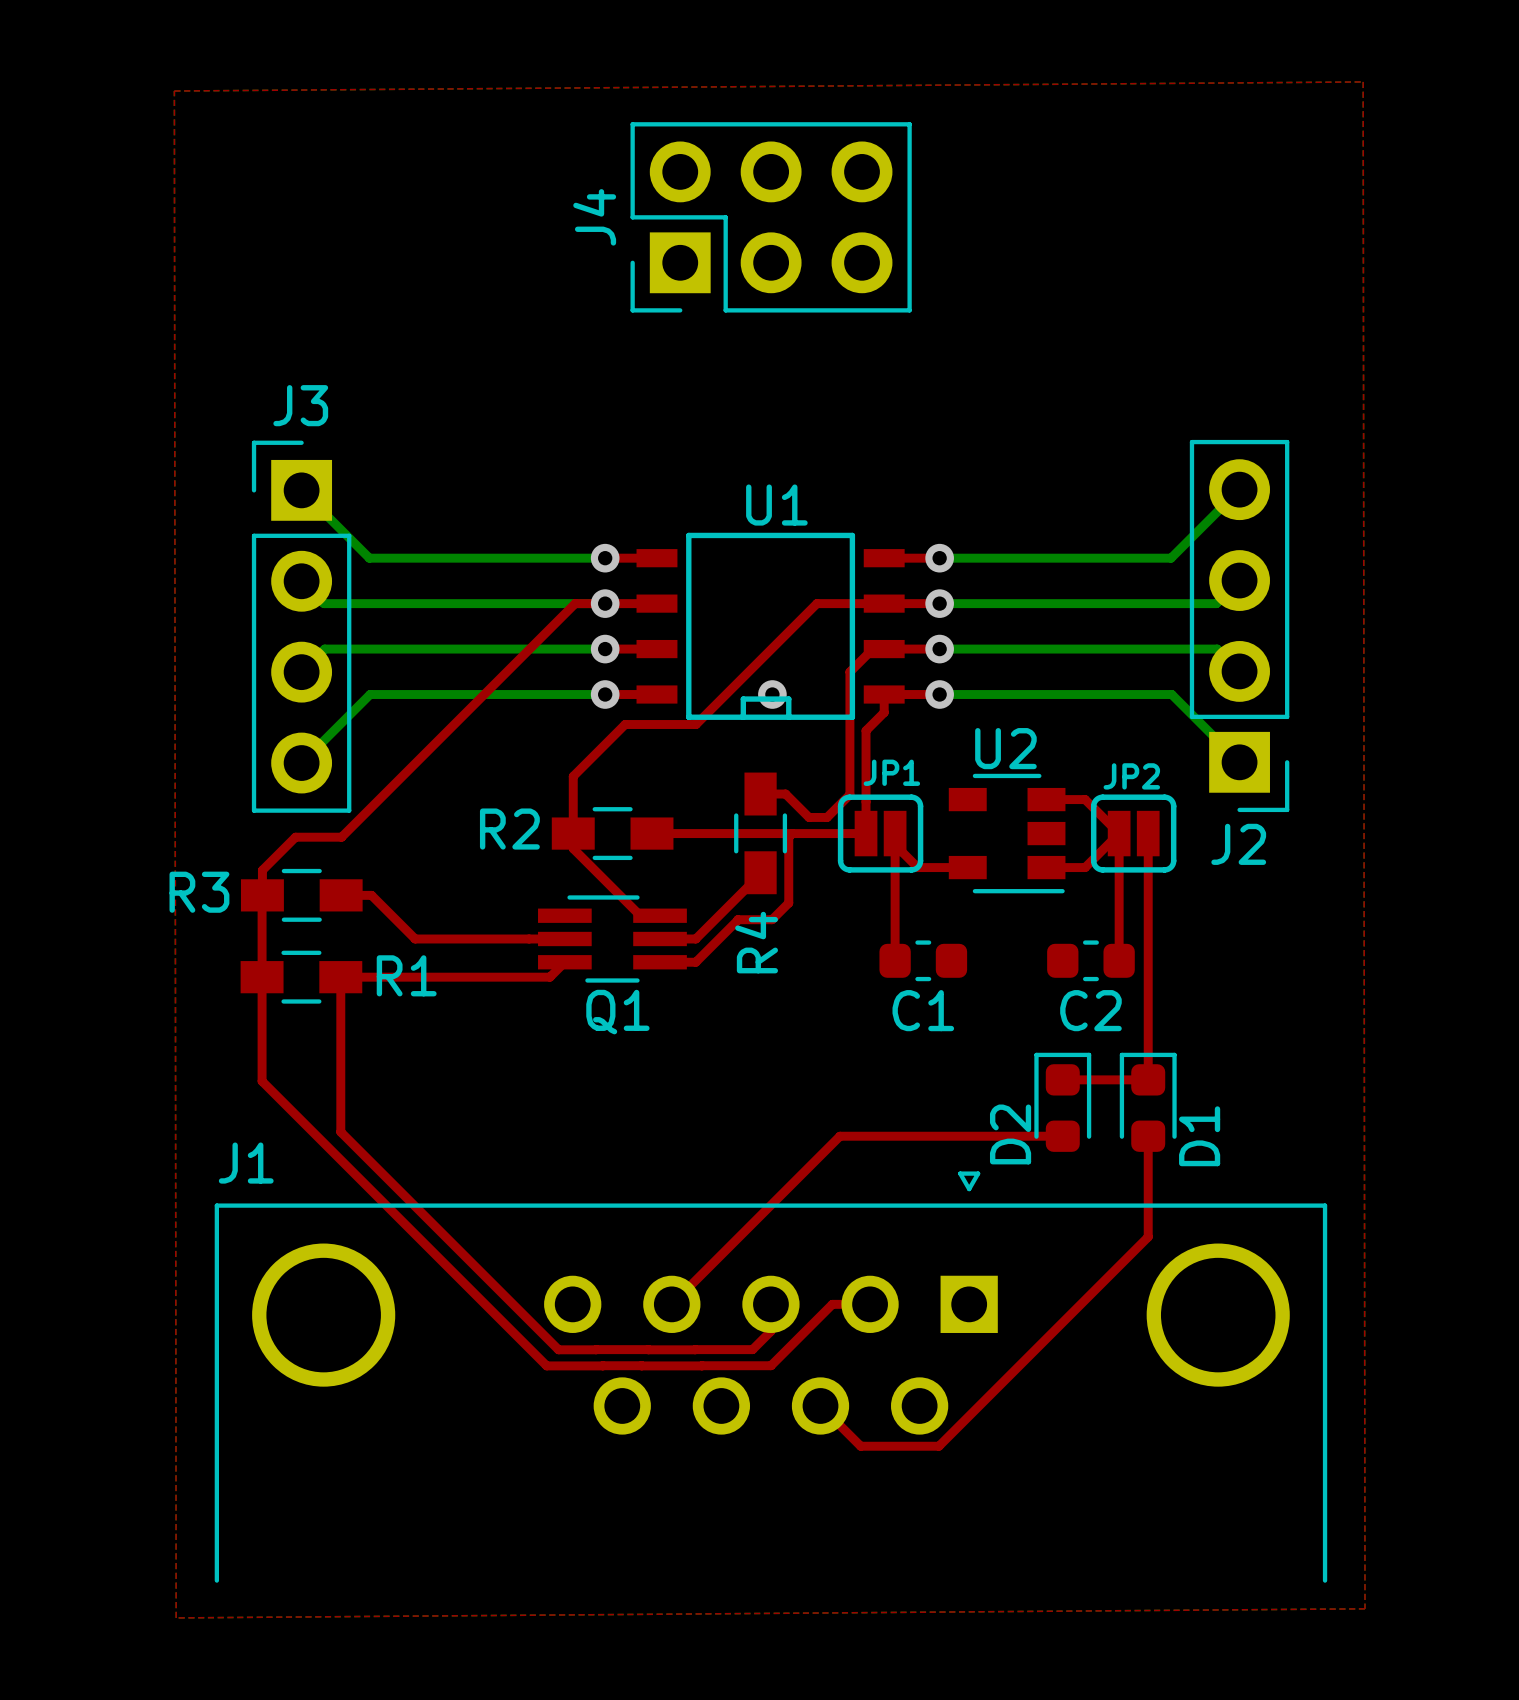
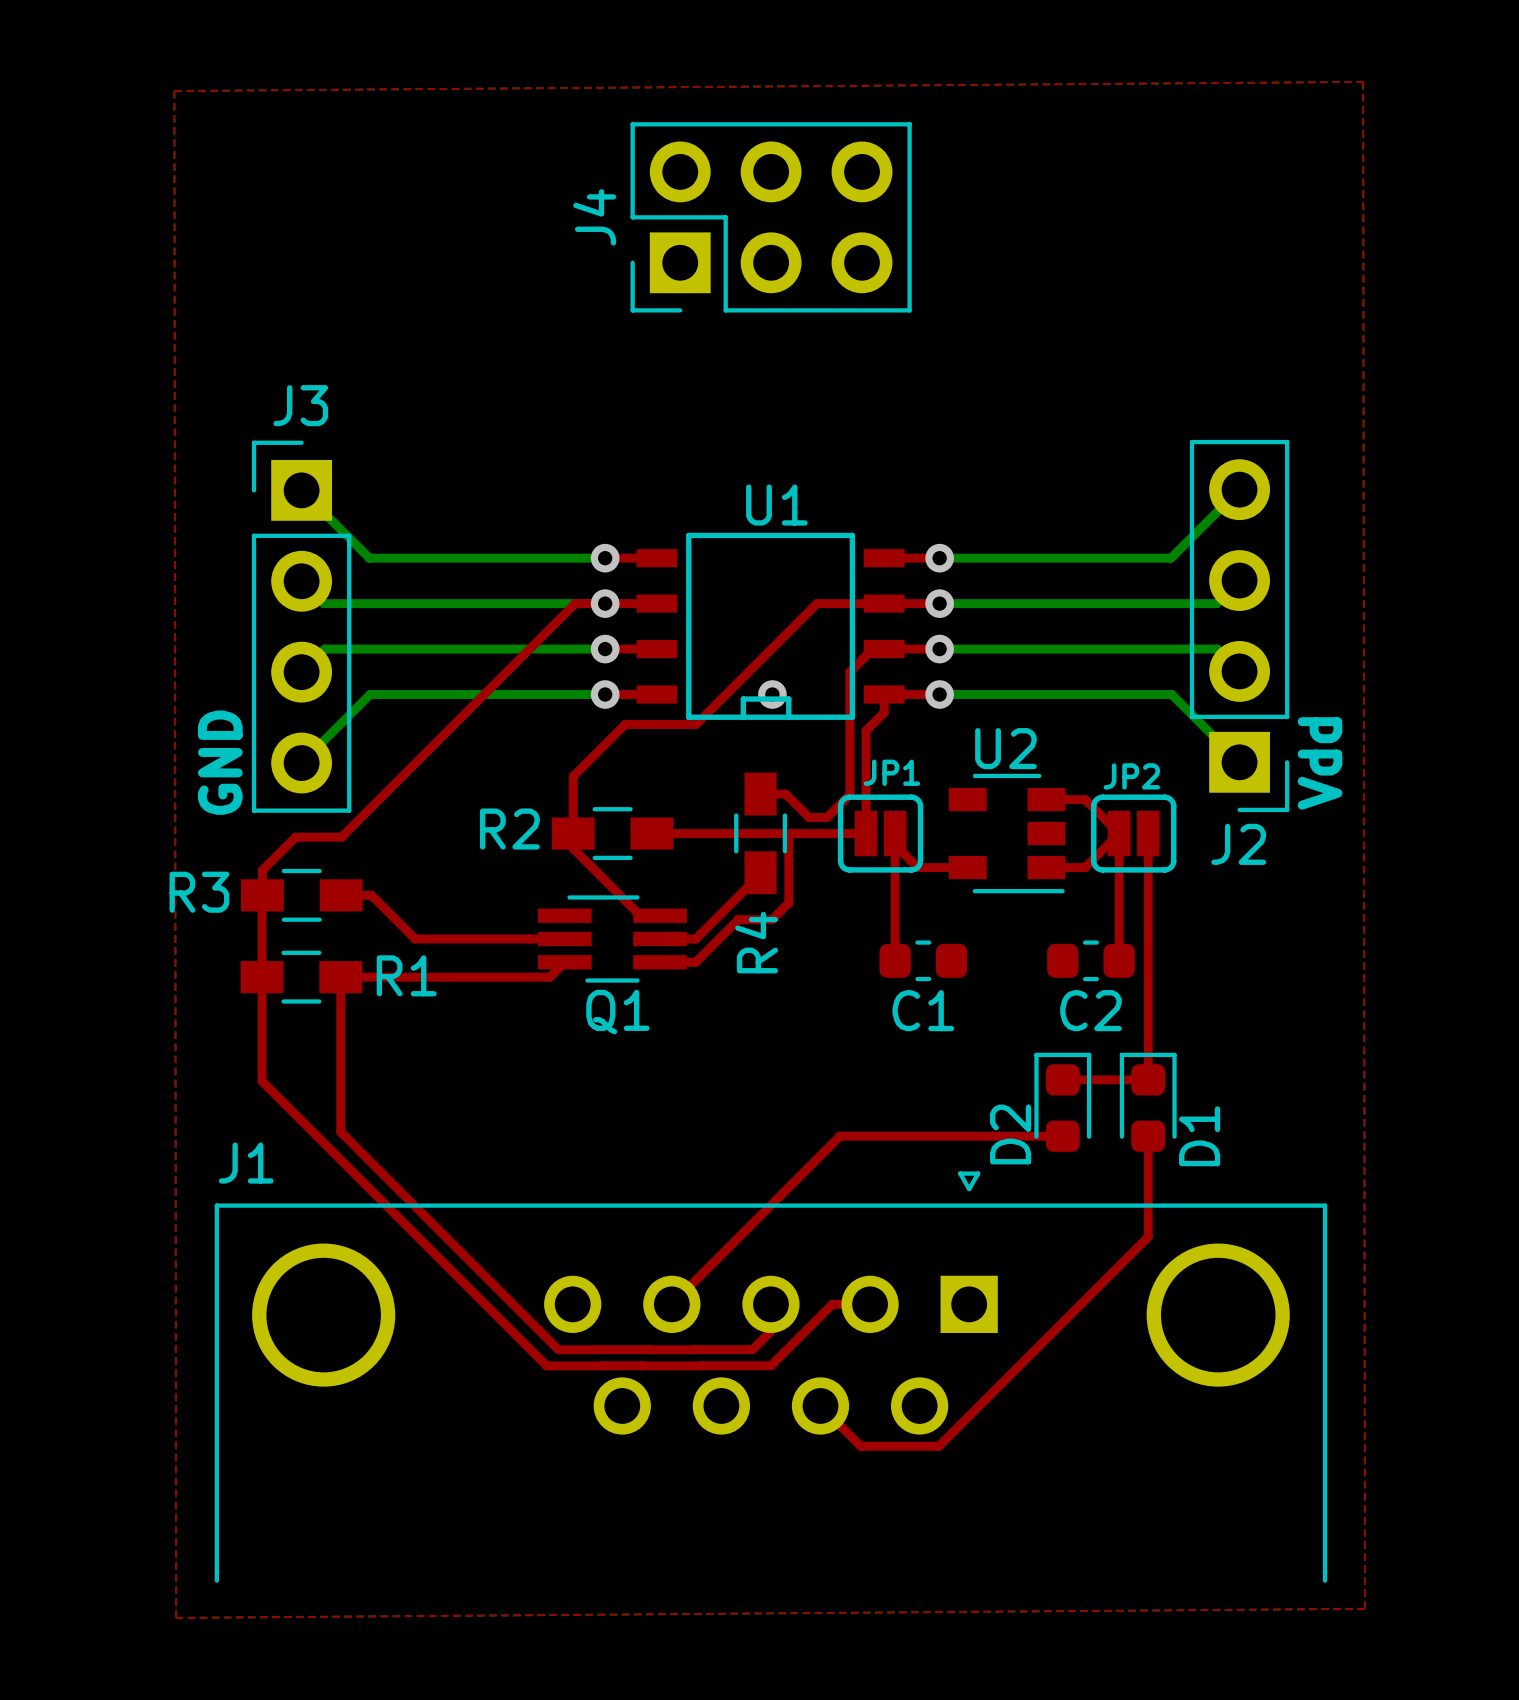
text: none -> GND (220, 762)
text: none -> Vdd (1320, 763)

